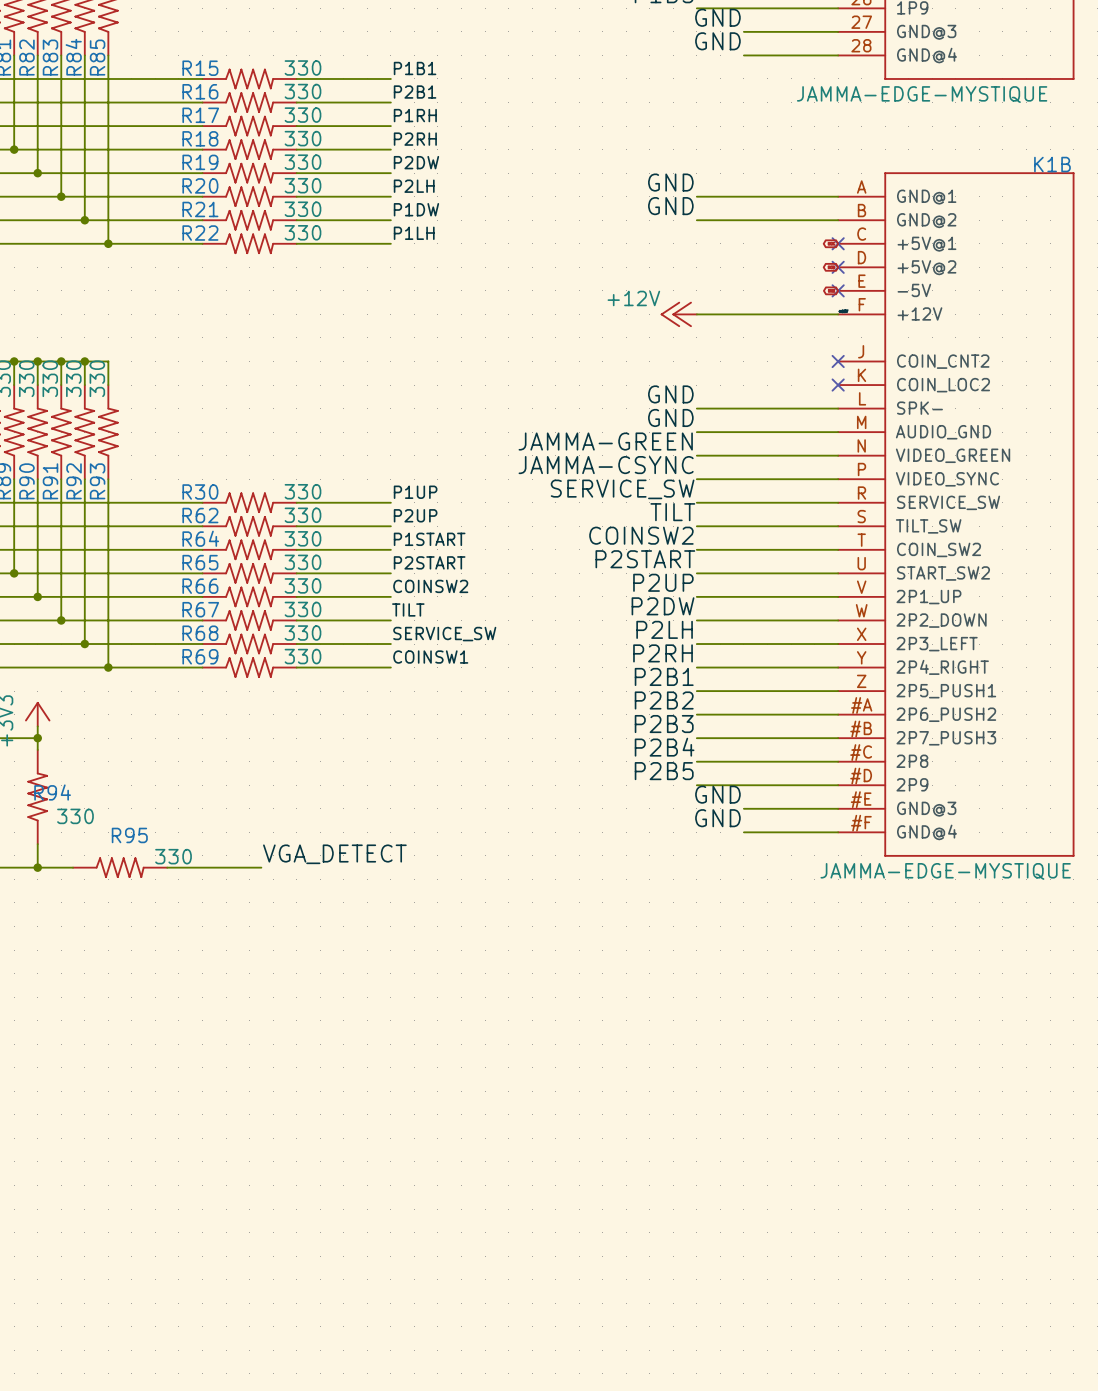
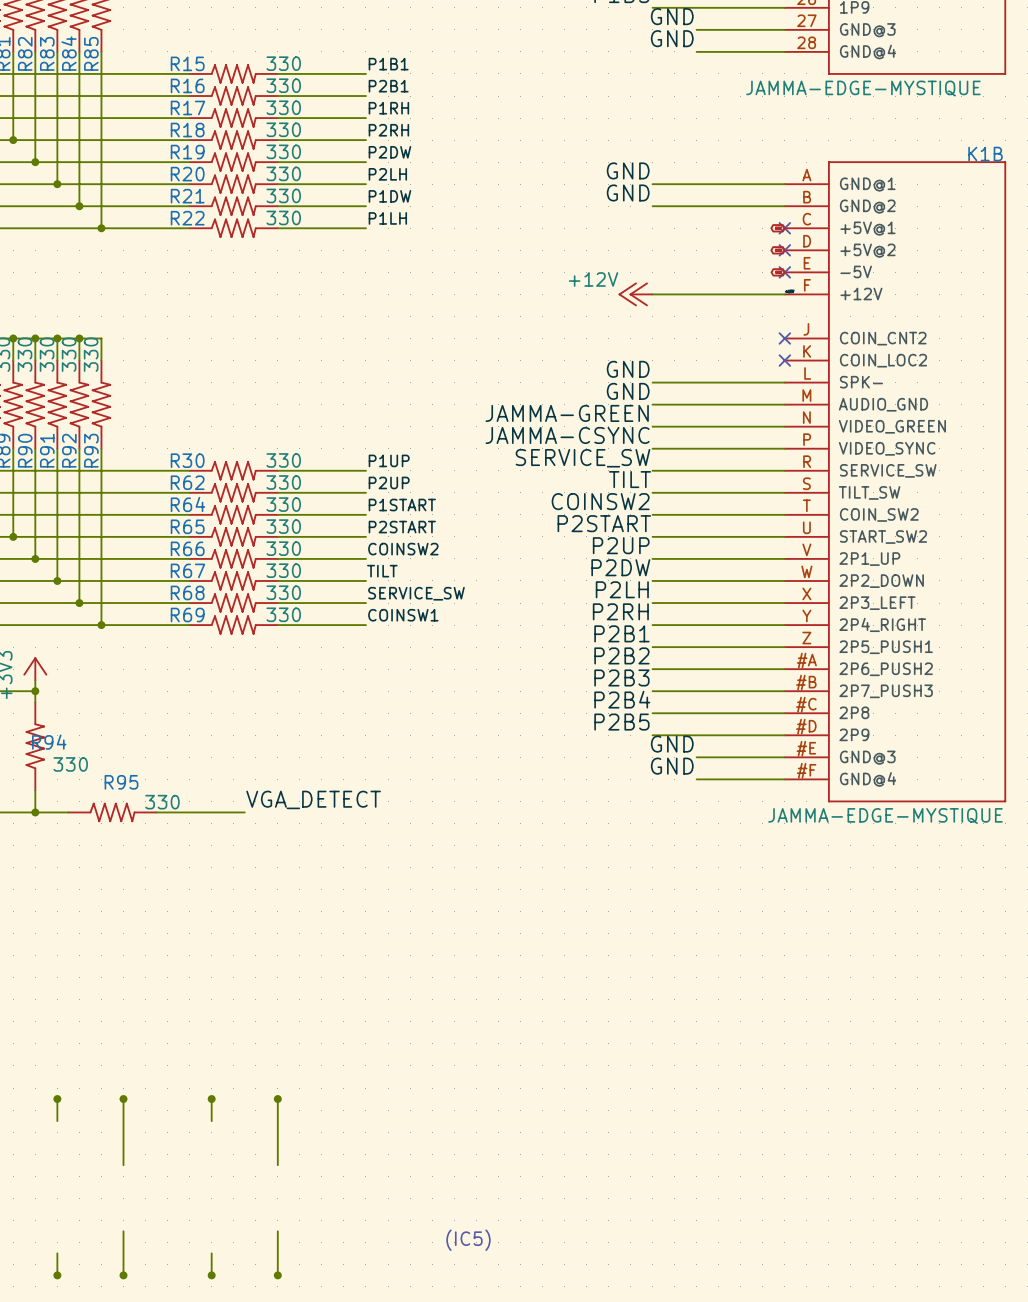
wire: none -> (57, 1099) (57, 1121)
junction: none -> (57, 1099)
wire: none -> (123, 1099) (123, 1165)
junction: none -> (123, 1099)
wire: none -> (211, 1099) (211, 1121)
junction: none -> (211, 1099)
wire: none -> (277, 1099) (277, 1165)
junction: none -> (277, 1099)
wire: none -> (123, 1231) (123, 1275)
wire: none -> (277, 1231) (277, 1275)
text: none -> (IC5) (468, 1240)
wire: none -> (57, 1253) (57, 1275)
wire: none -> (211, 1253) (211, 1275)
junction: none -> (57, 1275)
junction: none -> (123, 1275)
junction: none -> (211, 1275)
junction: none -> (277, 1275)

